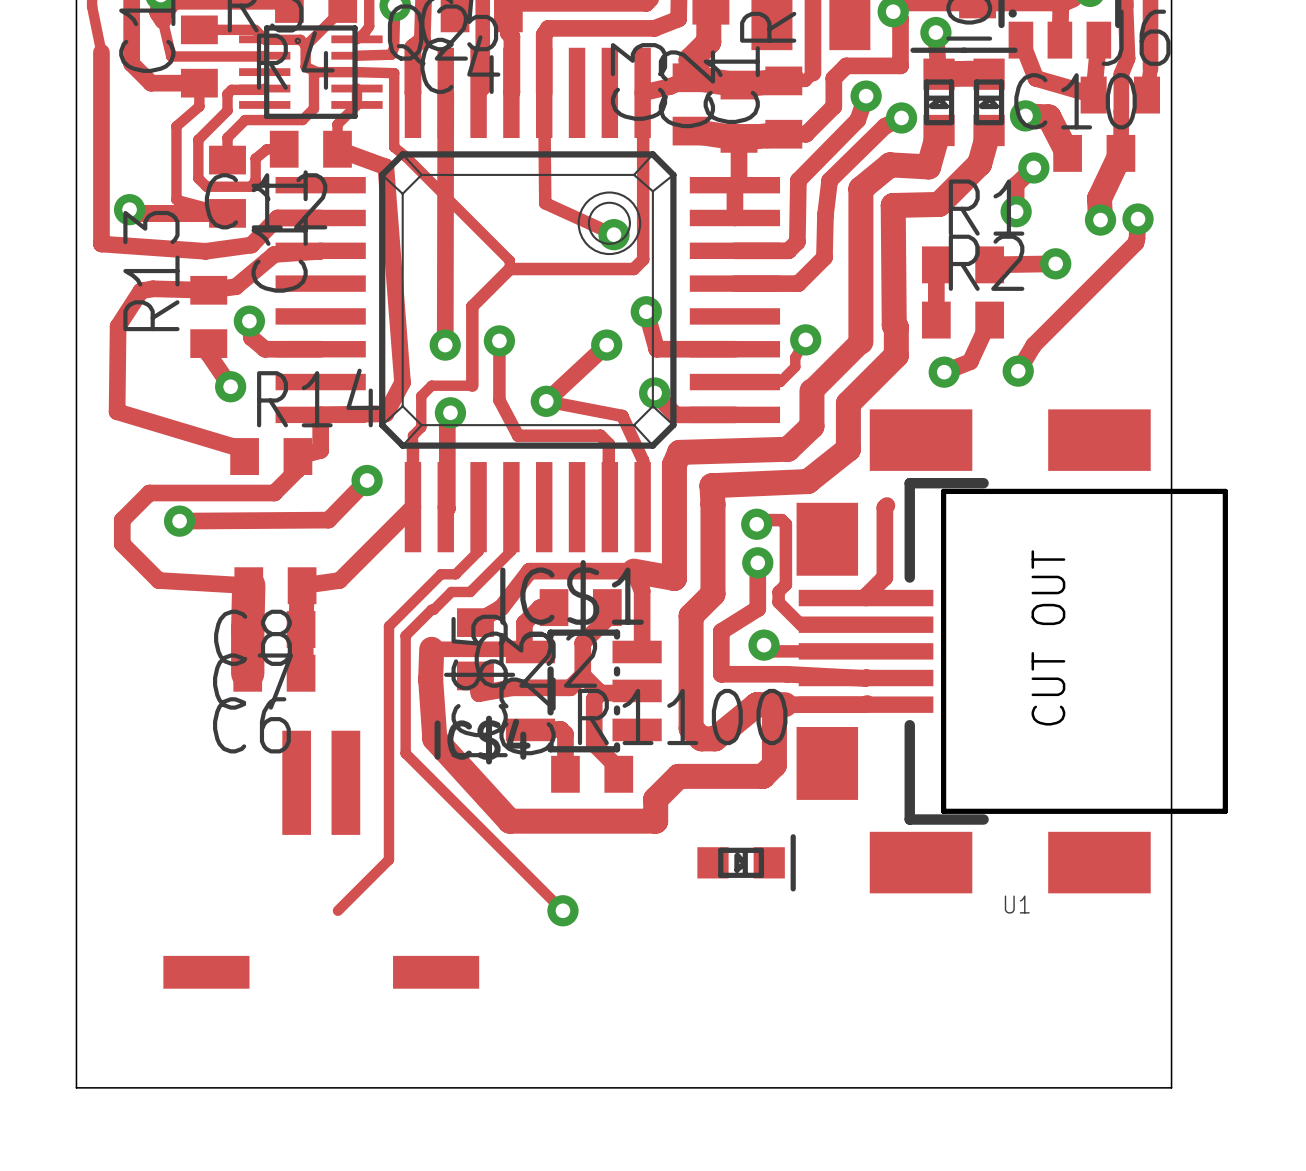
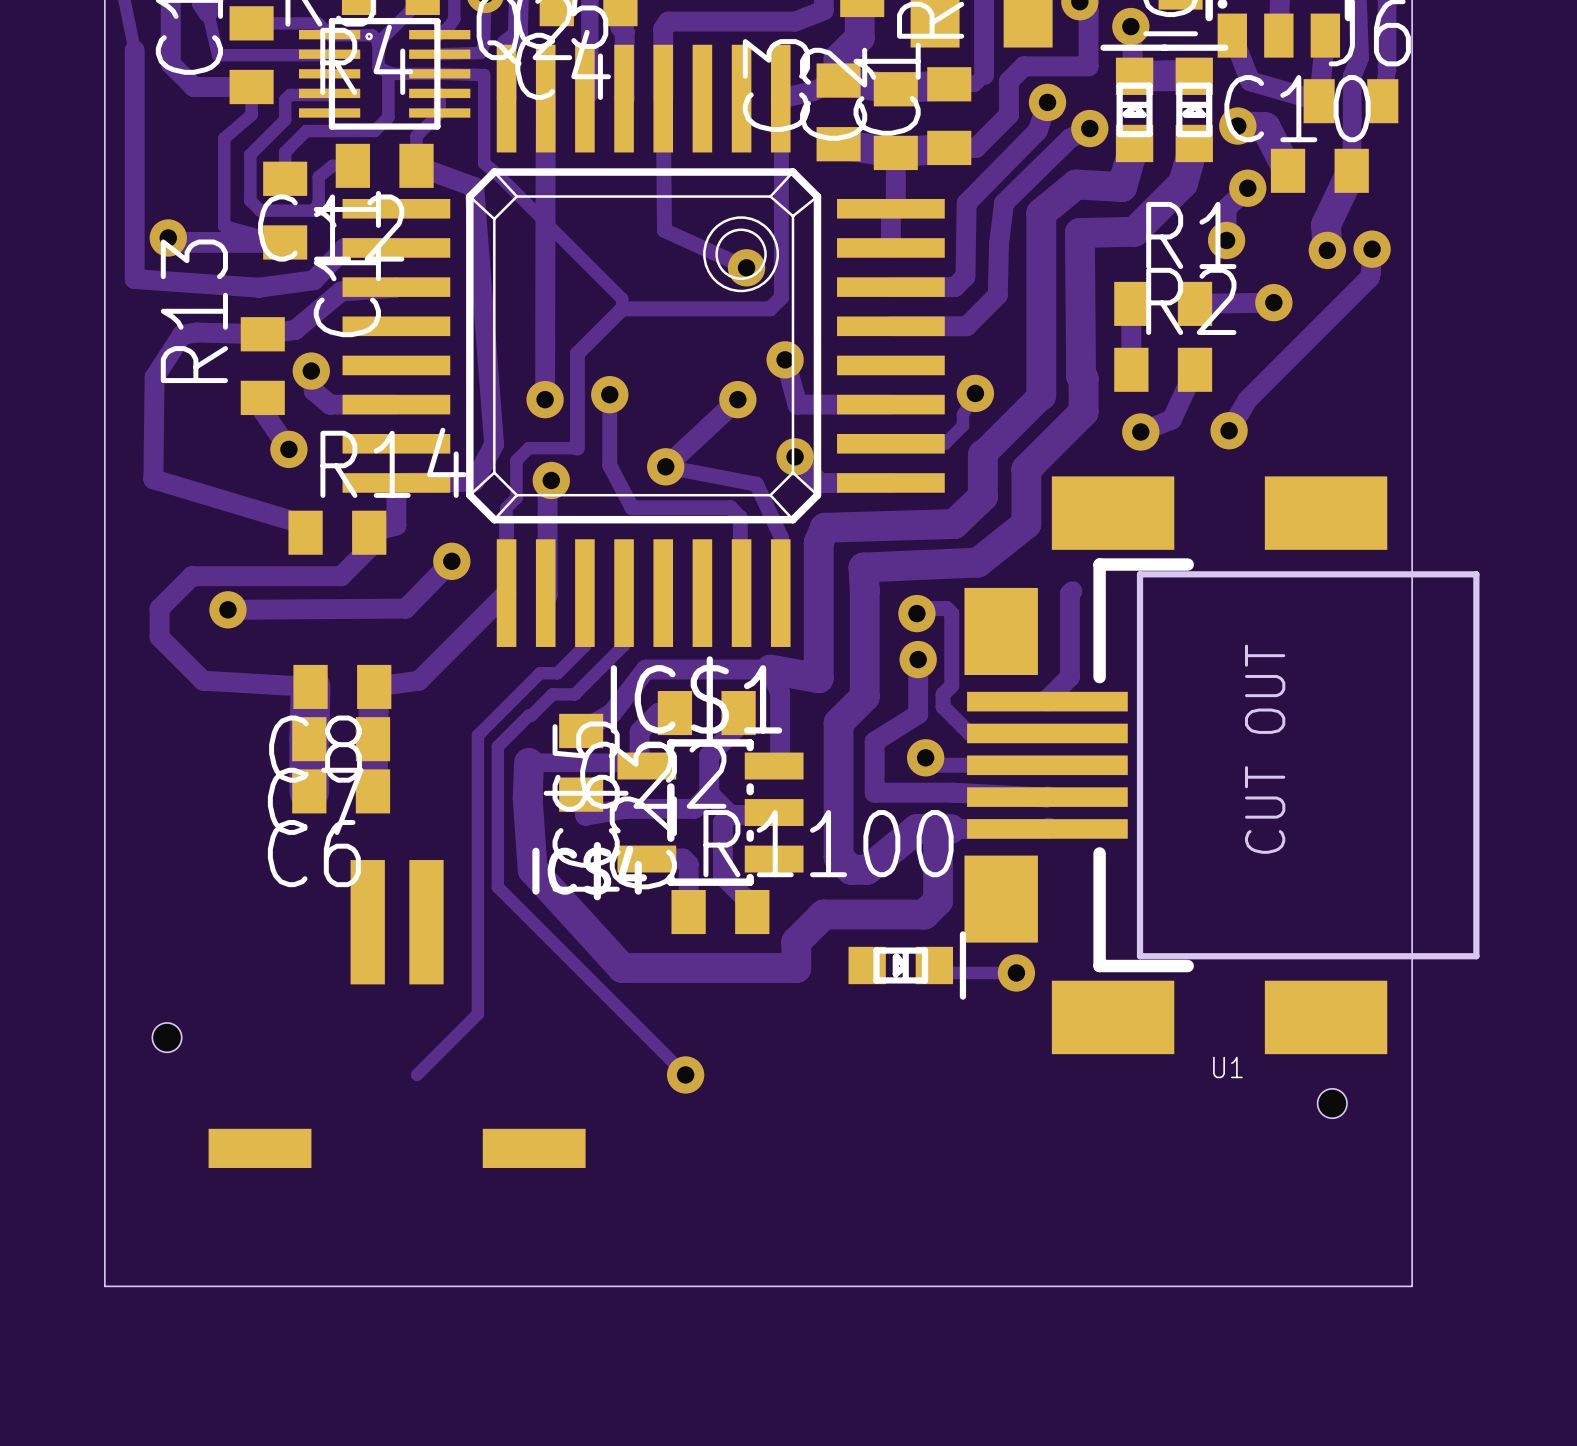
track: none -> (934, 965) (941, 972) (1016, 972)
via: none -> (1016, 972)
part position: (746, 862) -> (907, 965)
hole: none -> (167, 1037)
hole: none -> (1332, 1103)

